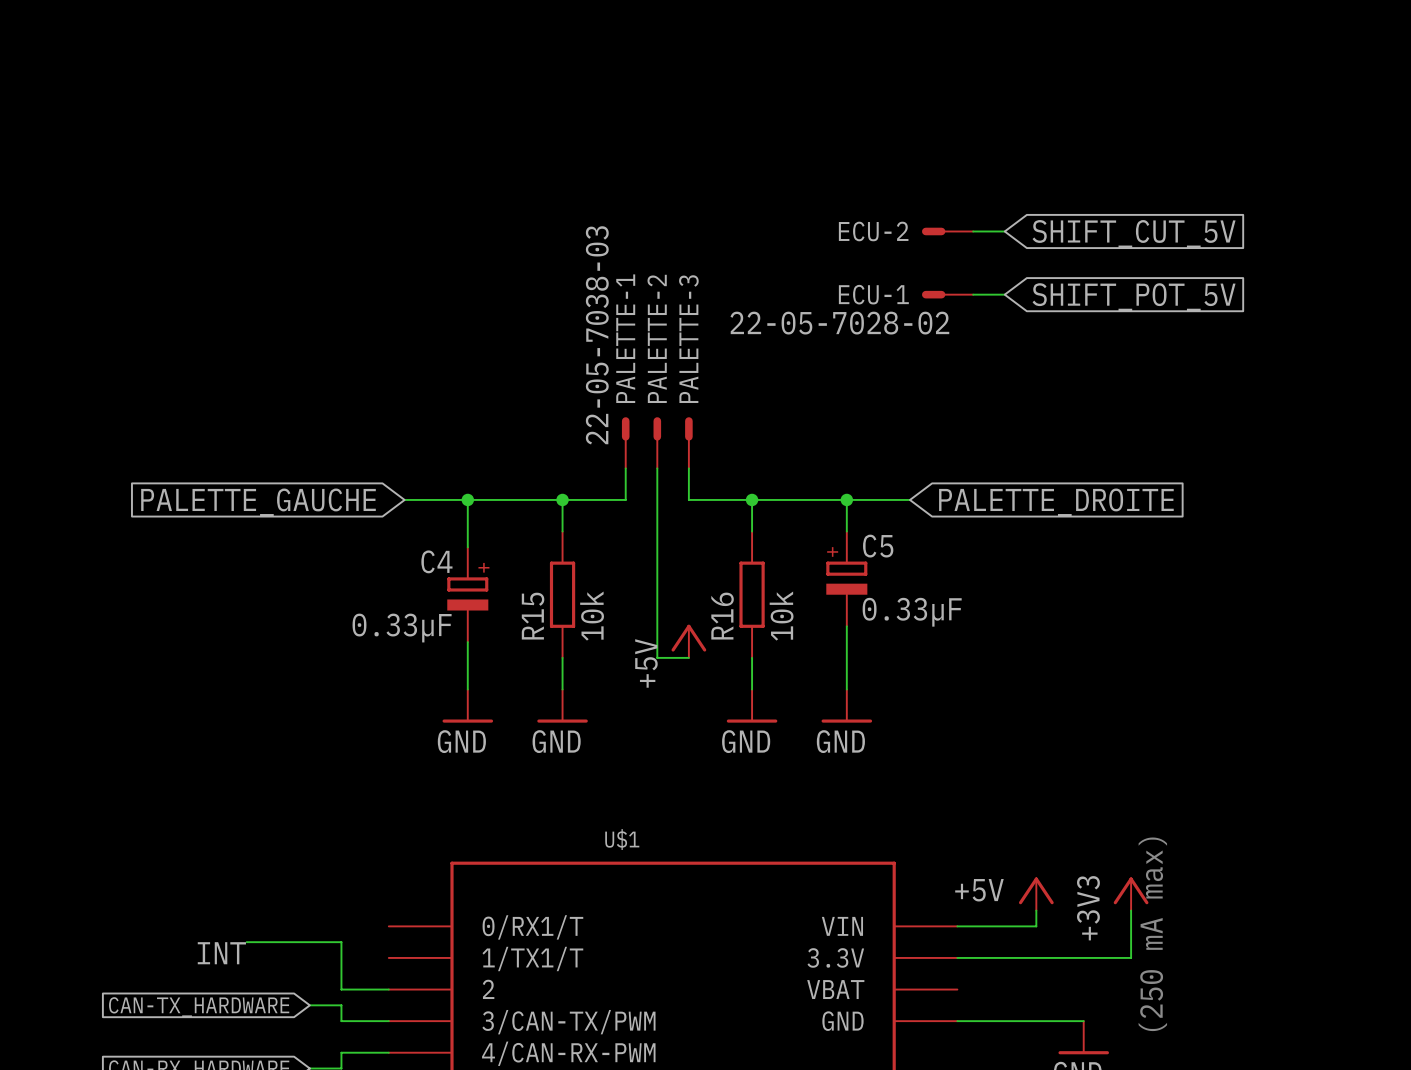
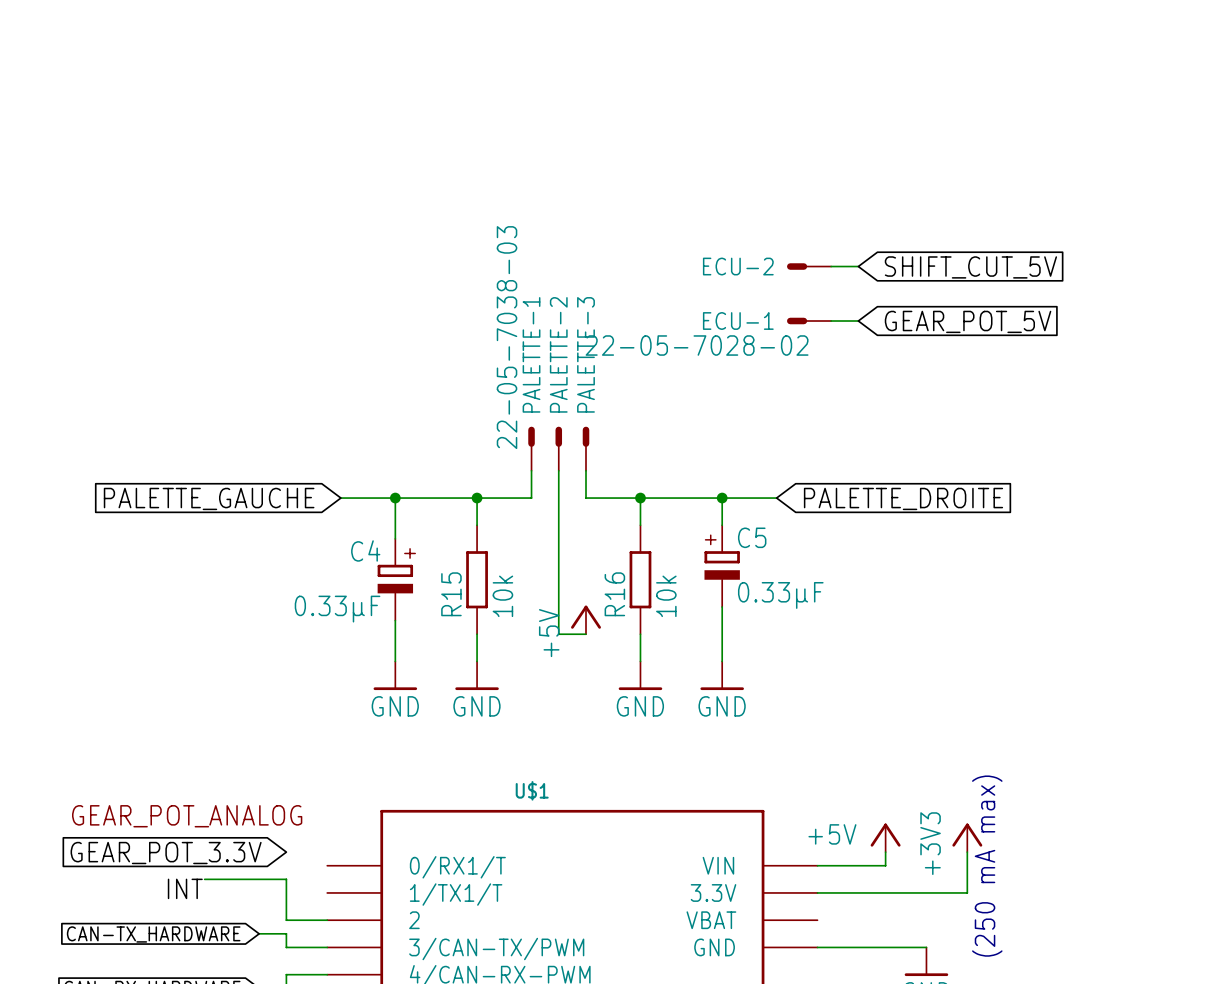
global label: SHIFT_POT_5V (1134, 297) -> GEAR_POT_5V (968, 321)
text: none -> GEAR_POT_ANALOG (187, 816)
global label: none -> GEAR_POT_3.3V (166, 853)

